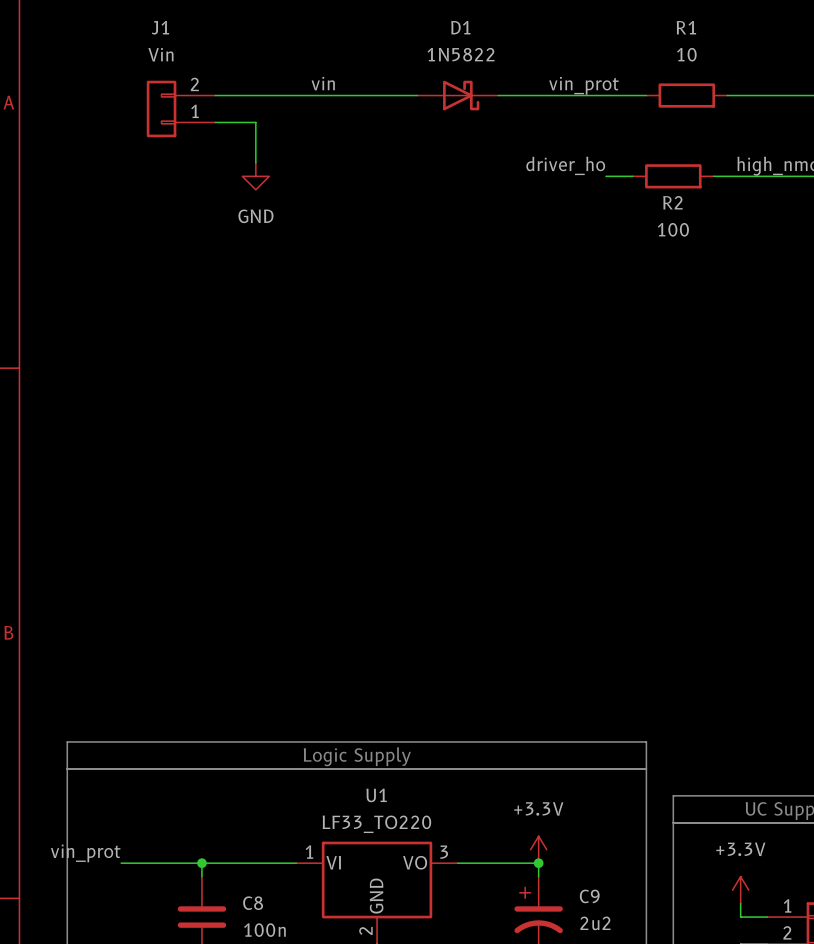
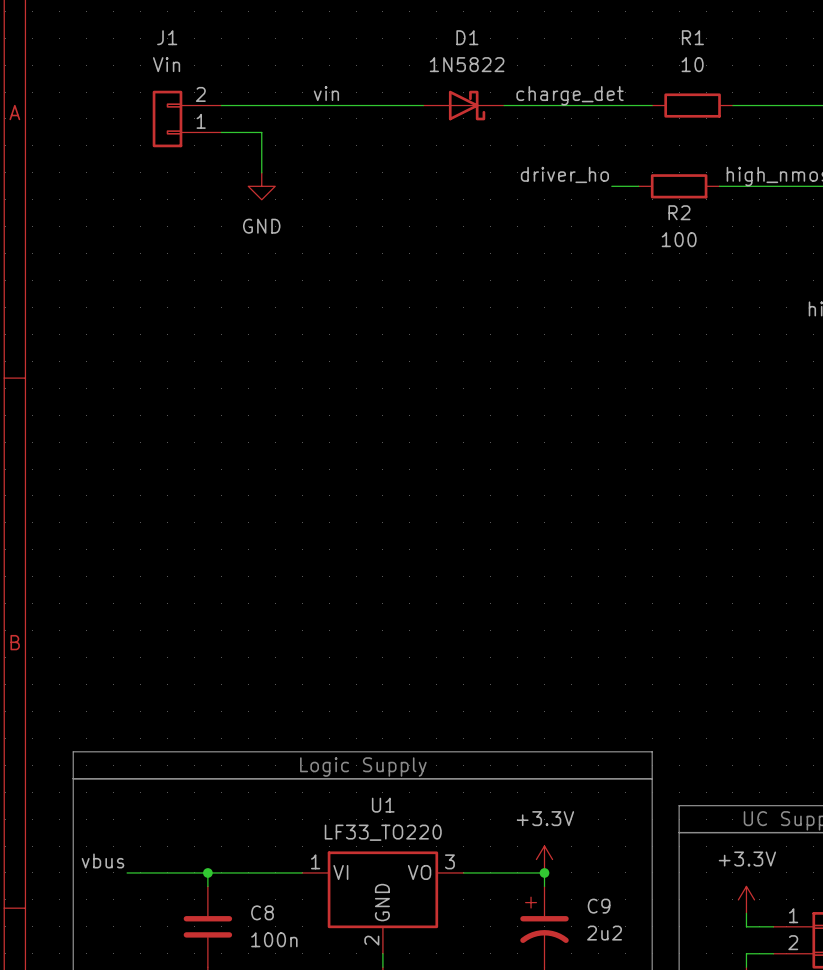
label: vin_prot (583, 85) -> charge_det (570, 95)
label: vin_prot (85, 853) -> vbus (102, 860)

